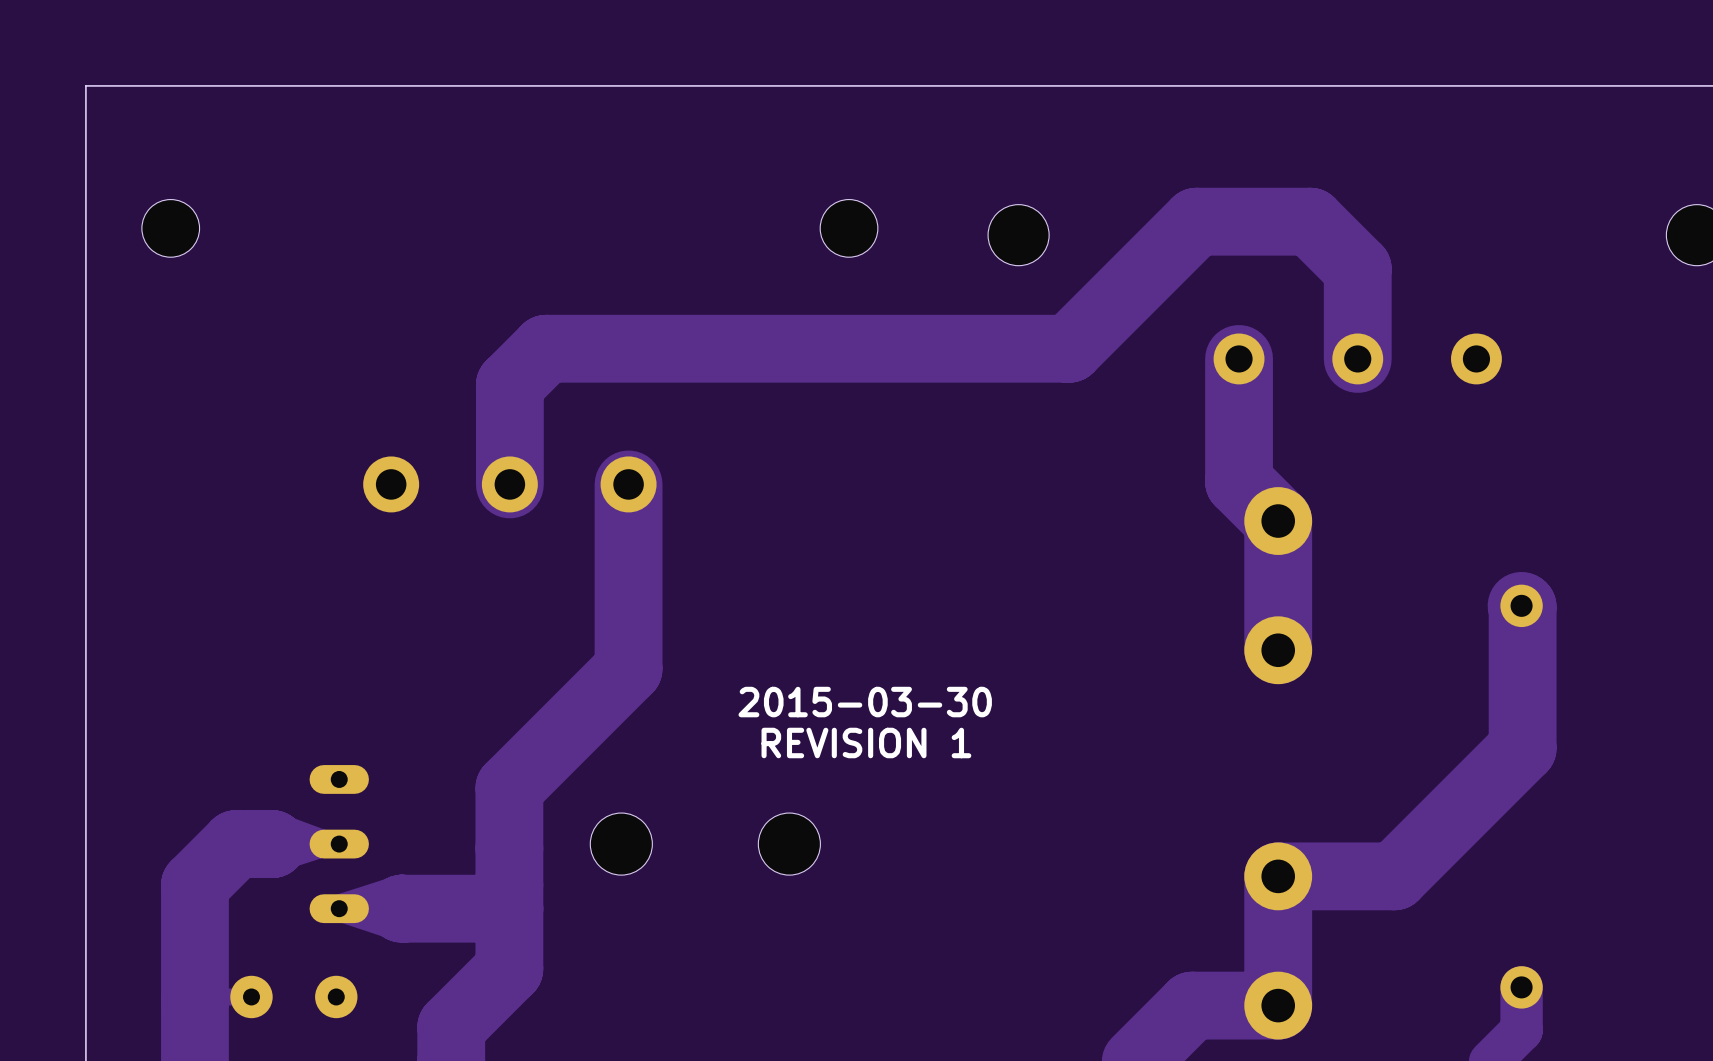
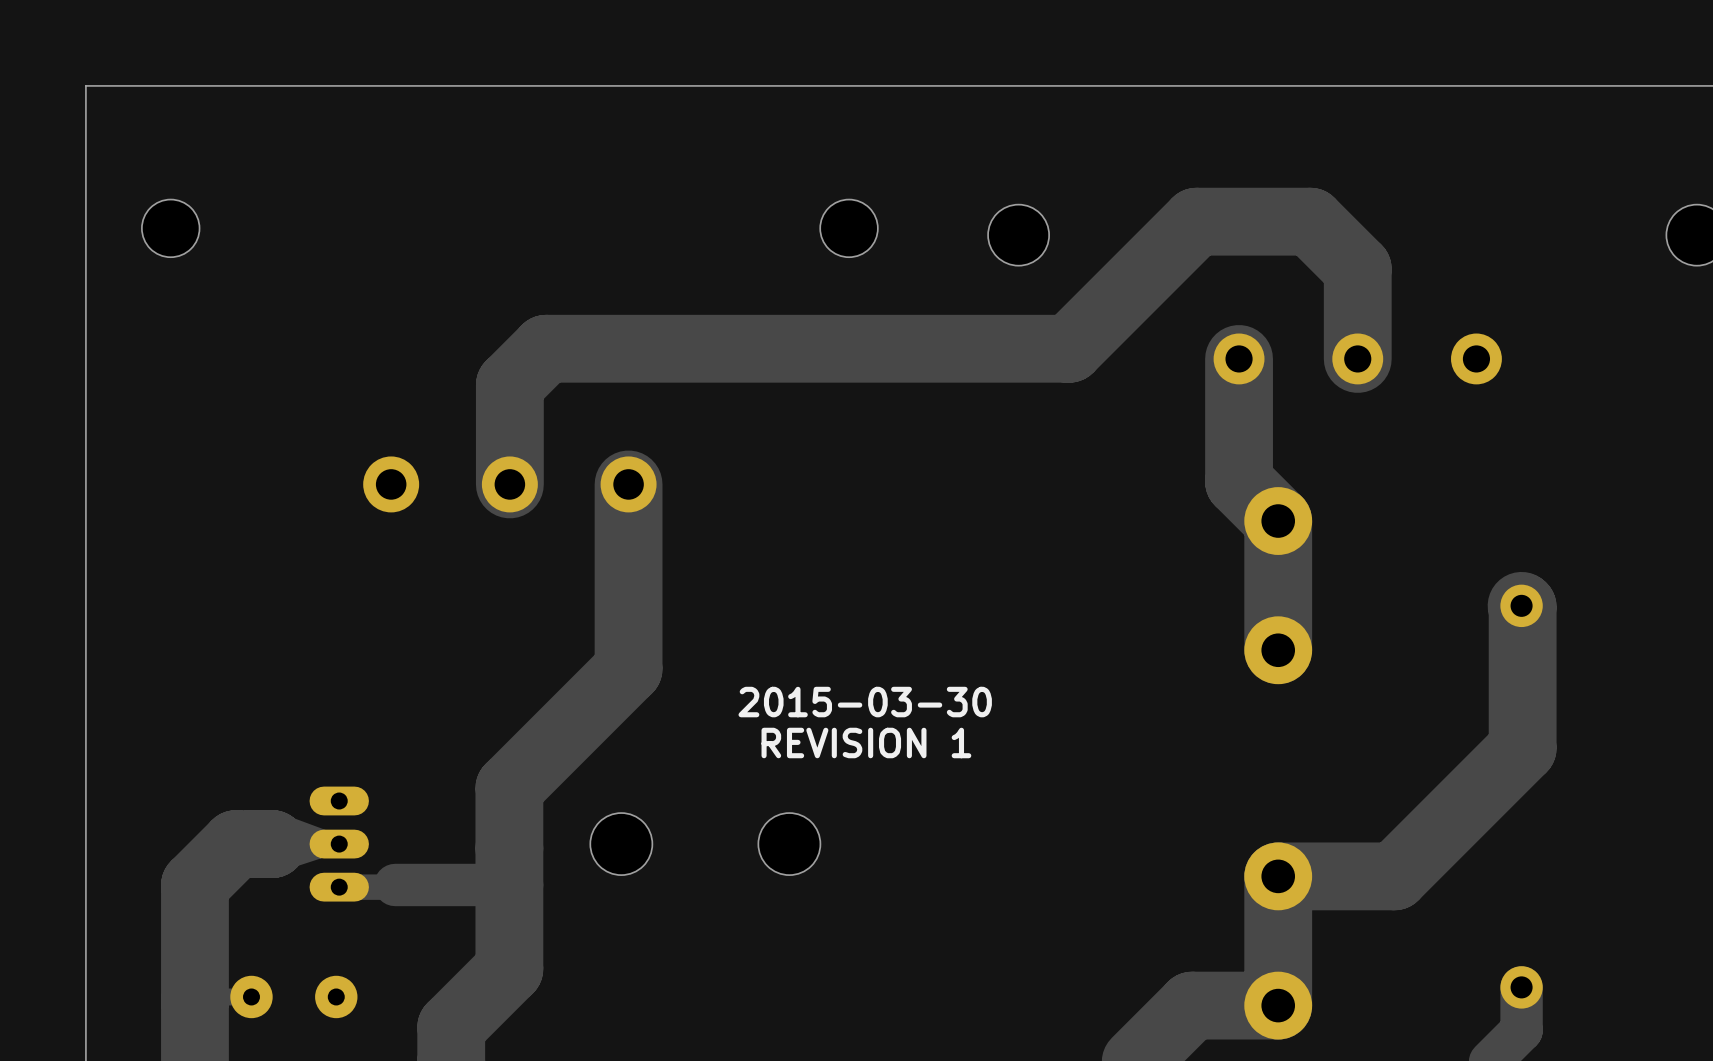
part footprint: [309, 765, 369, 924] -> [309, 786, 369, 902]
track: none -> (509, 884) (339, 887)
track: (509, 908) (401, 908) (401, 887) (339, 908) (403, 930) (403, 908) -> none

